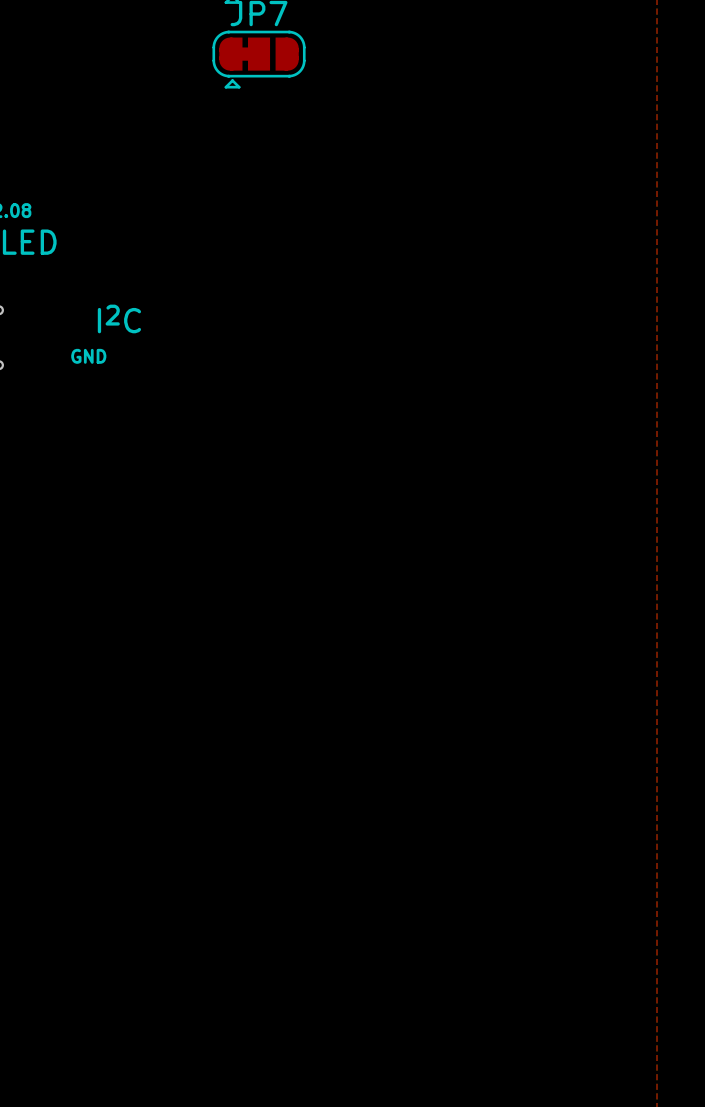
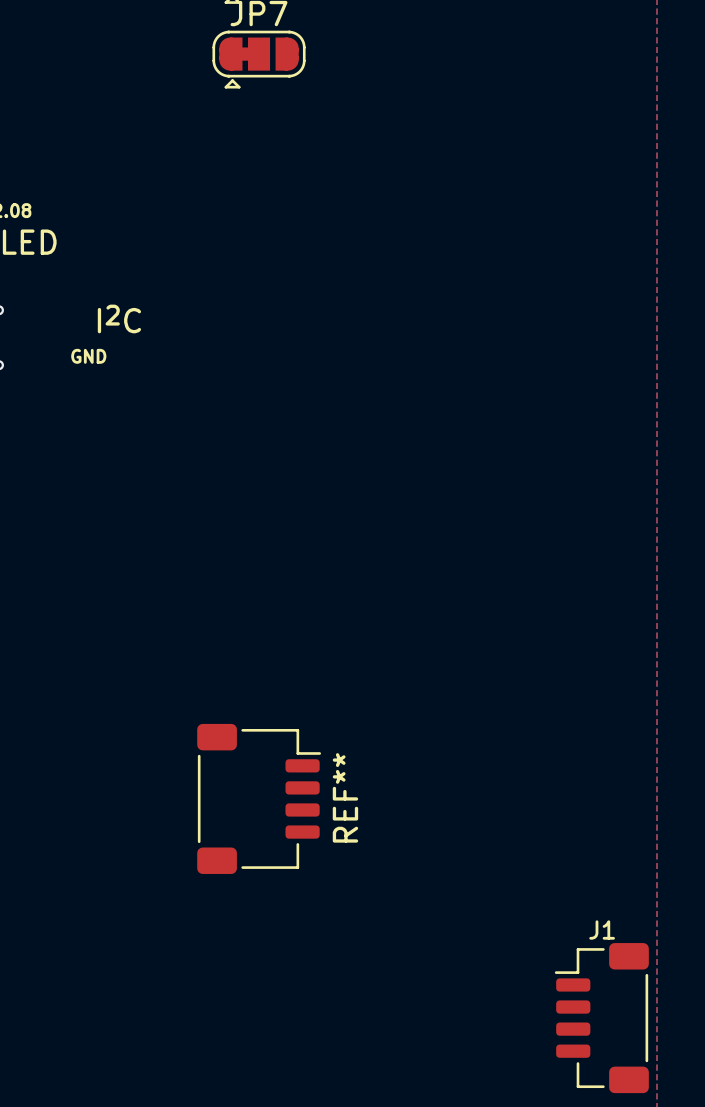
REF**: none -> (259, 798)
J1: none -> (601, 1018)

